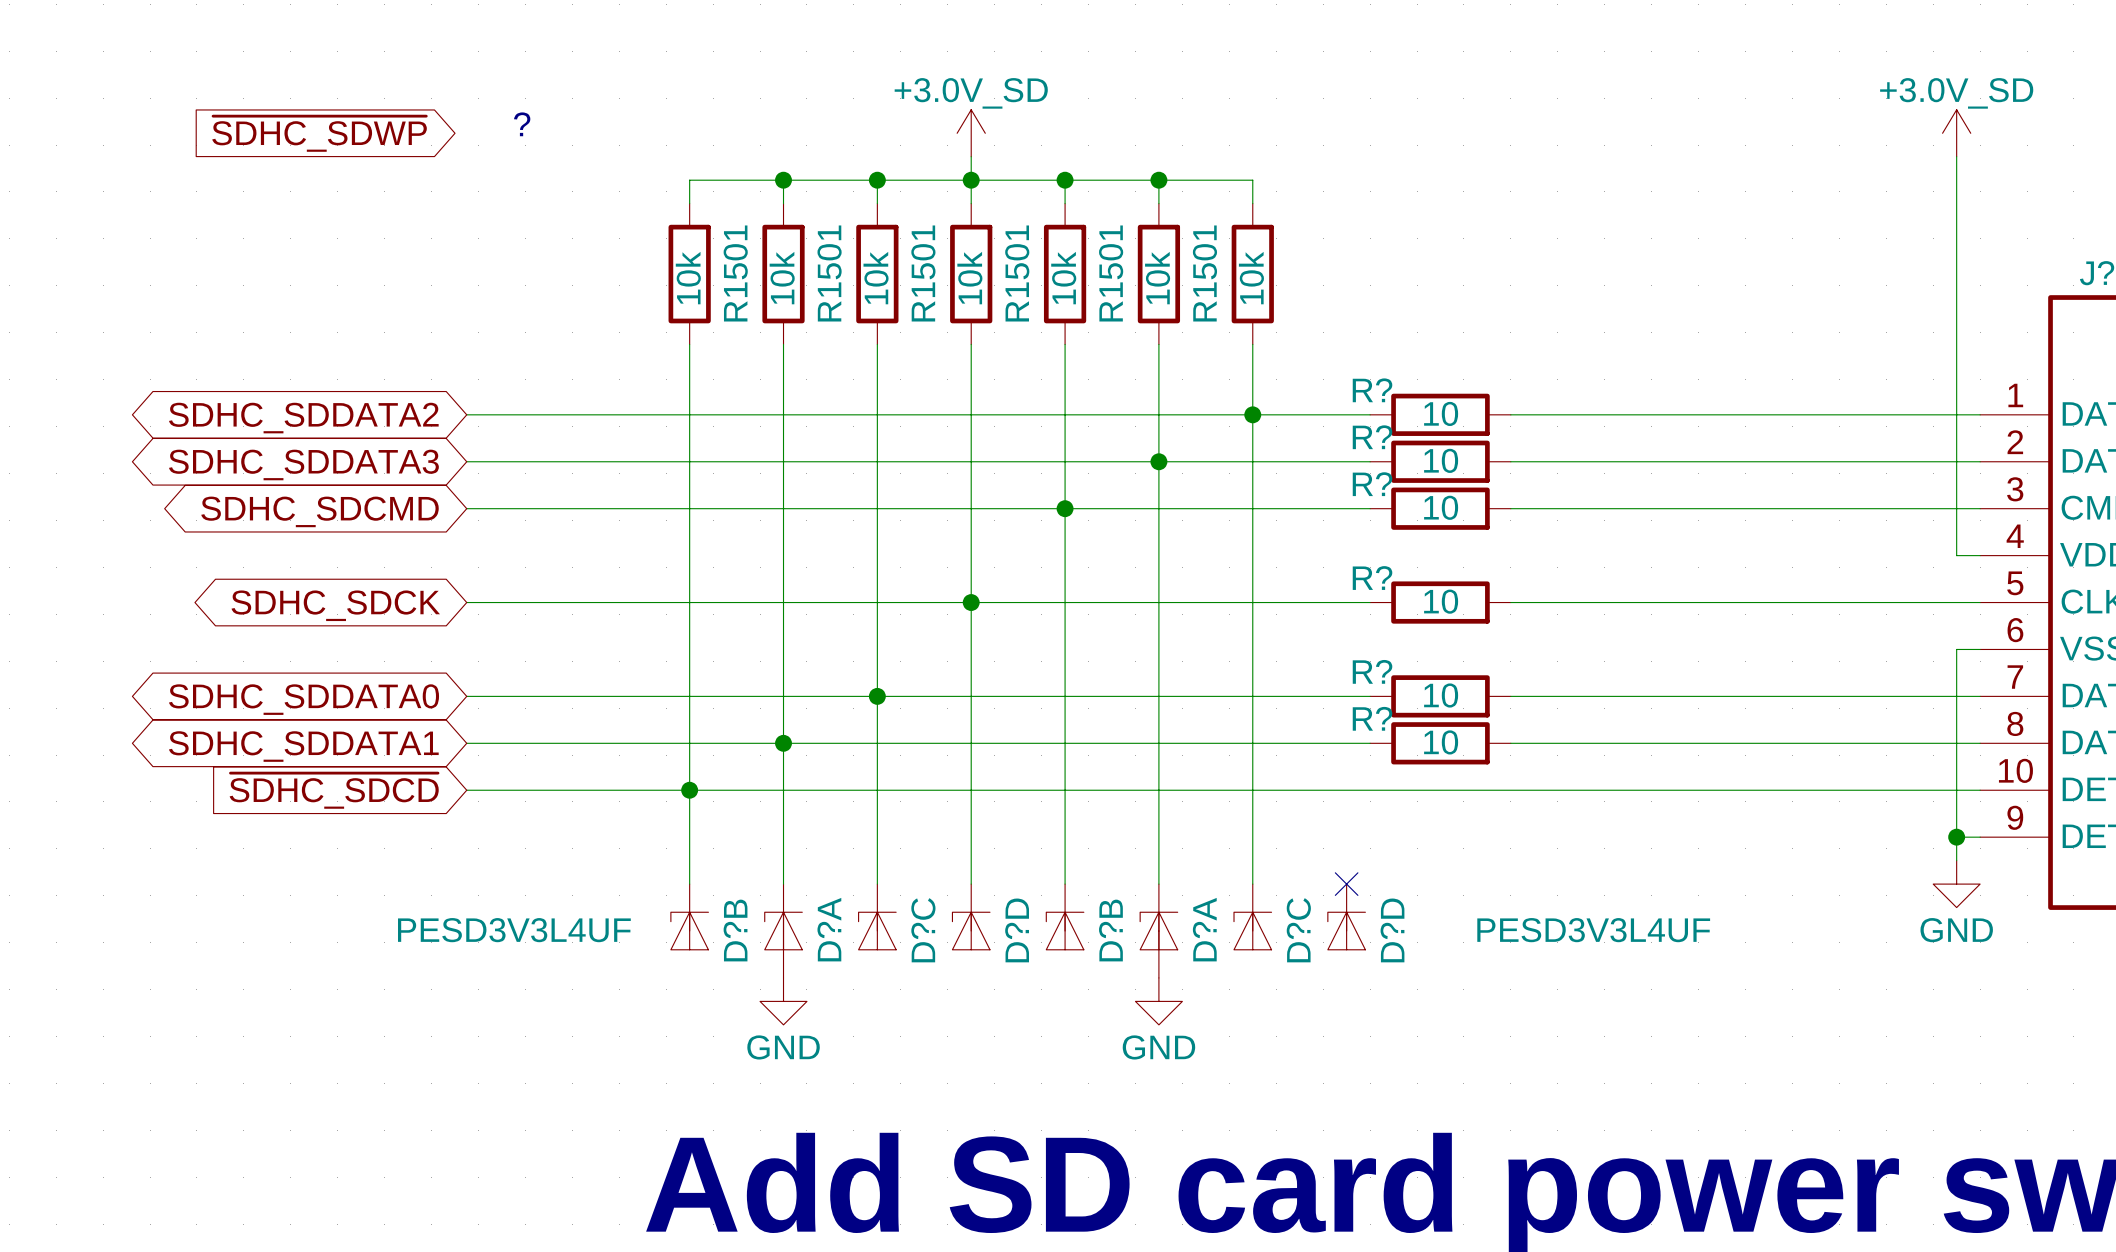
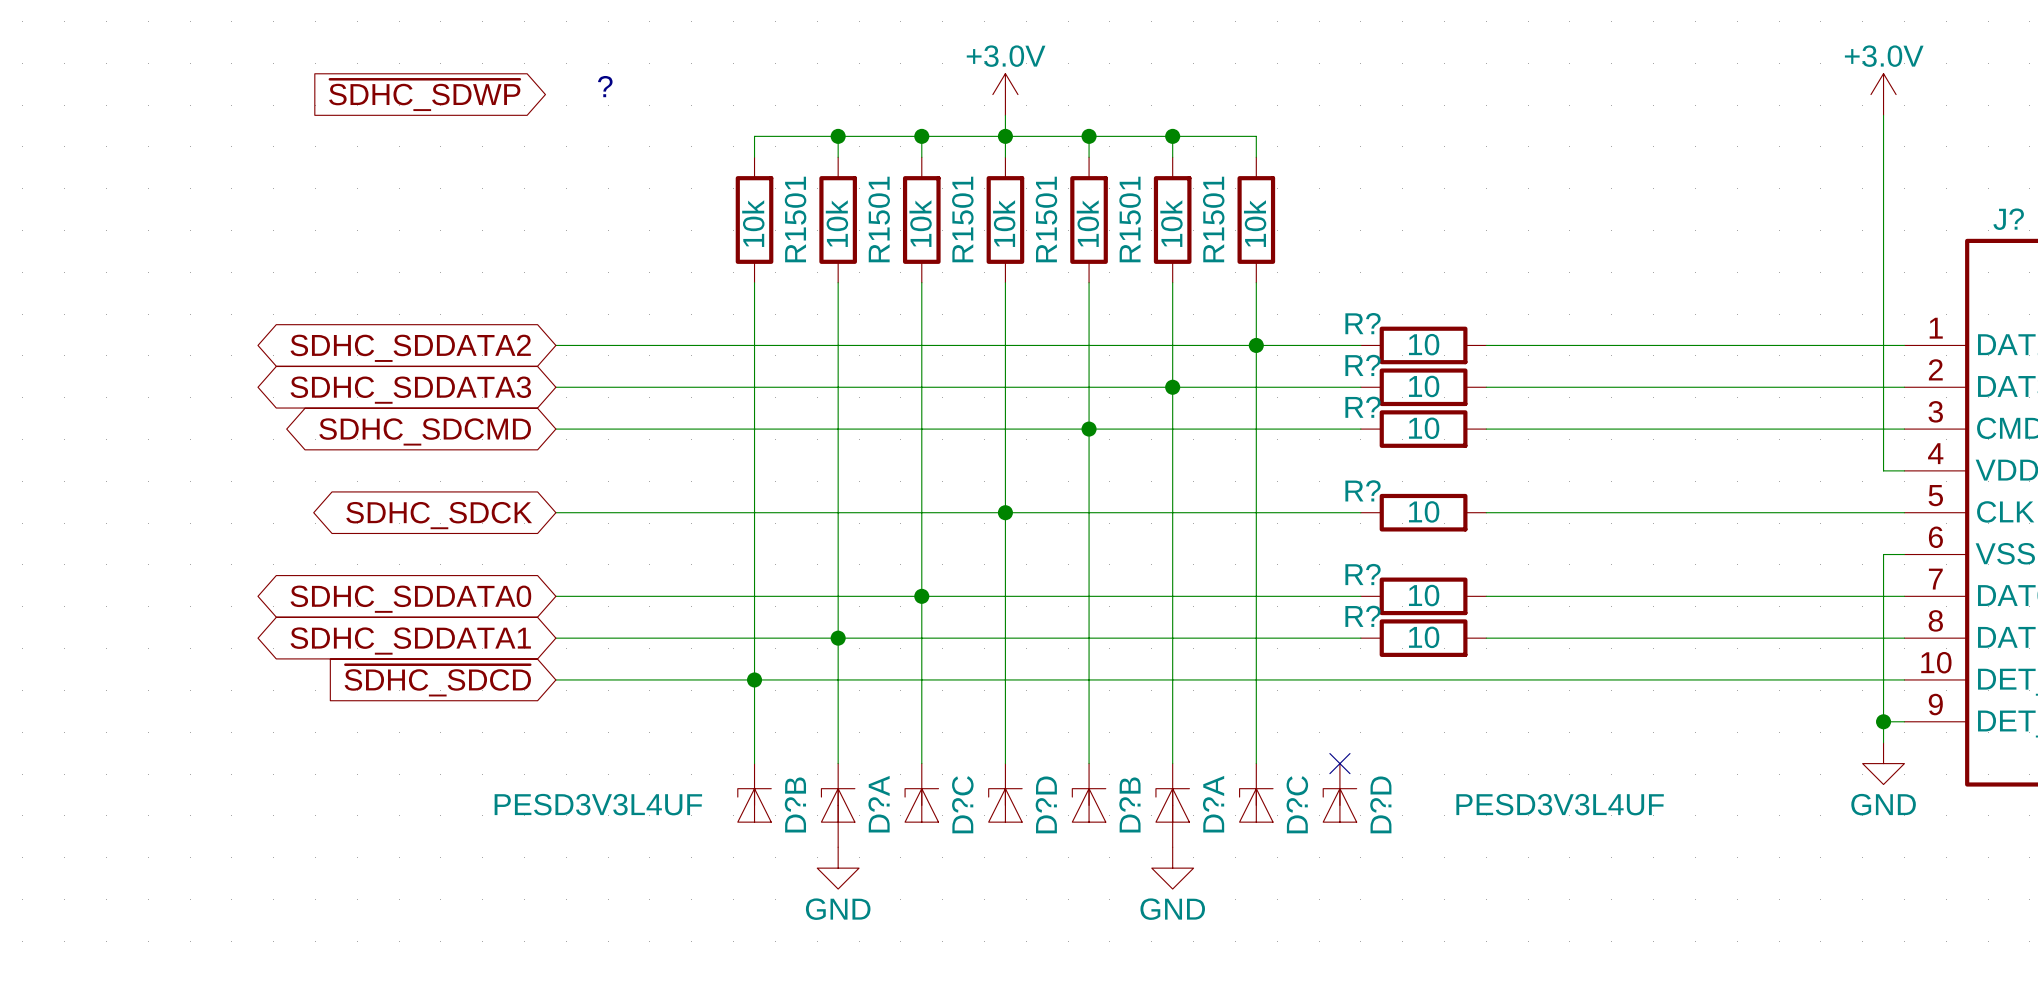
power symbol: +3.0V_SD (971, 133) -> +3.0V (1005, 94)
power symbol: +3.0V_SD (1956, 133) -> +3.0V (1883, 94)

